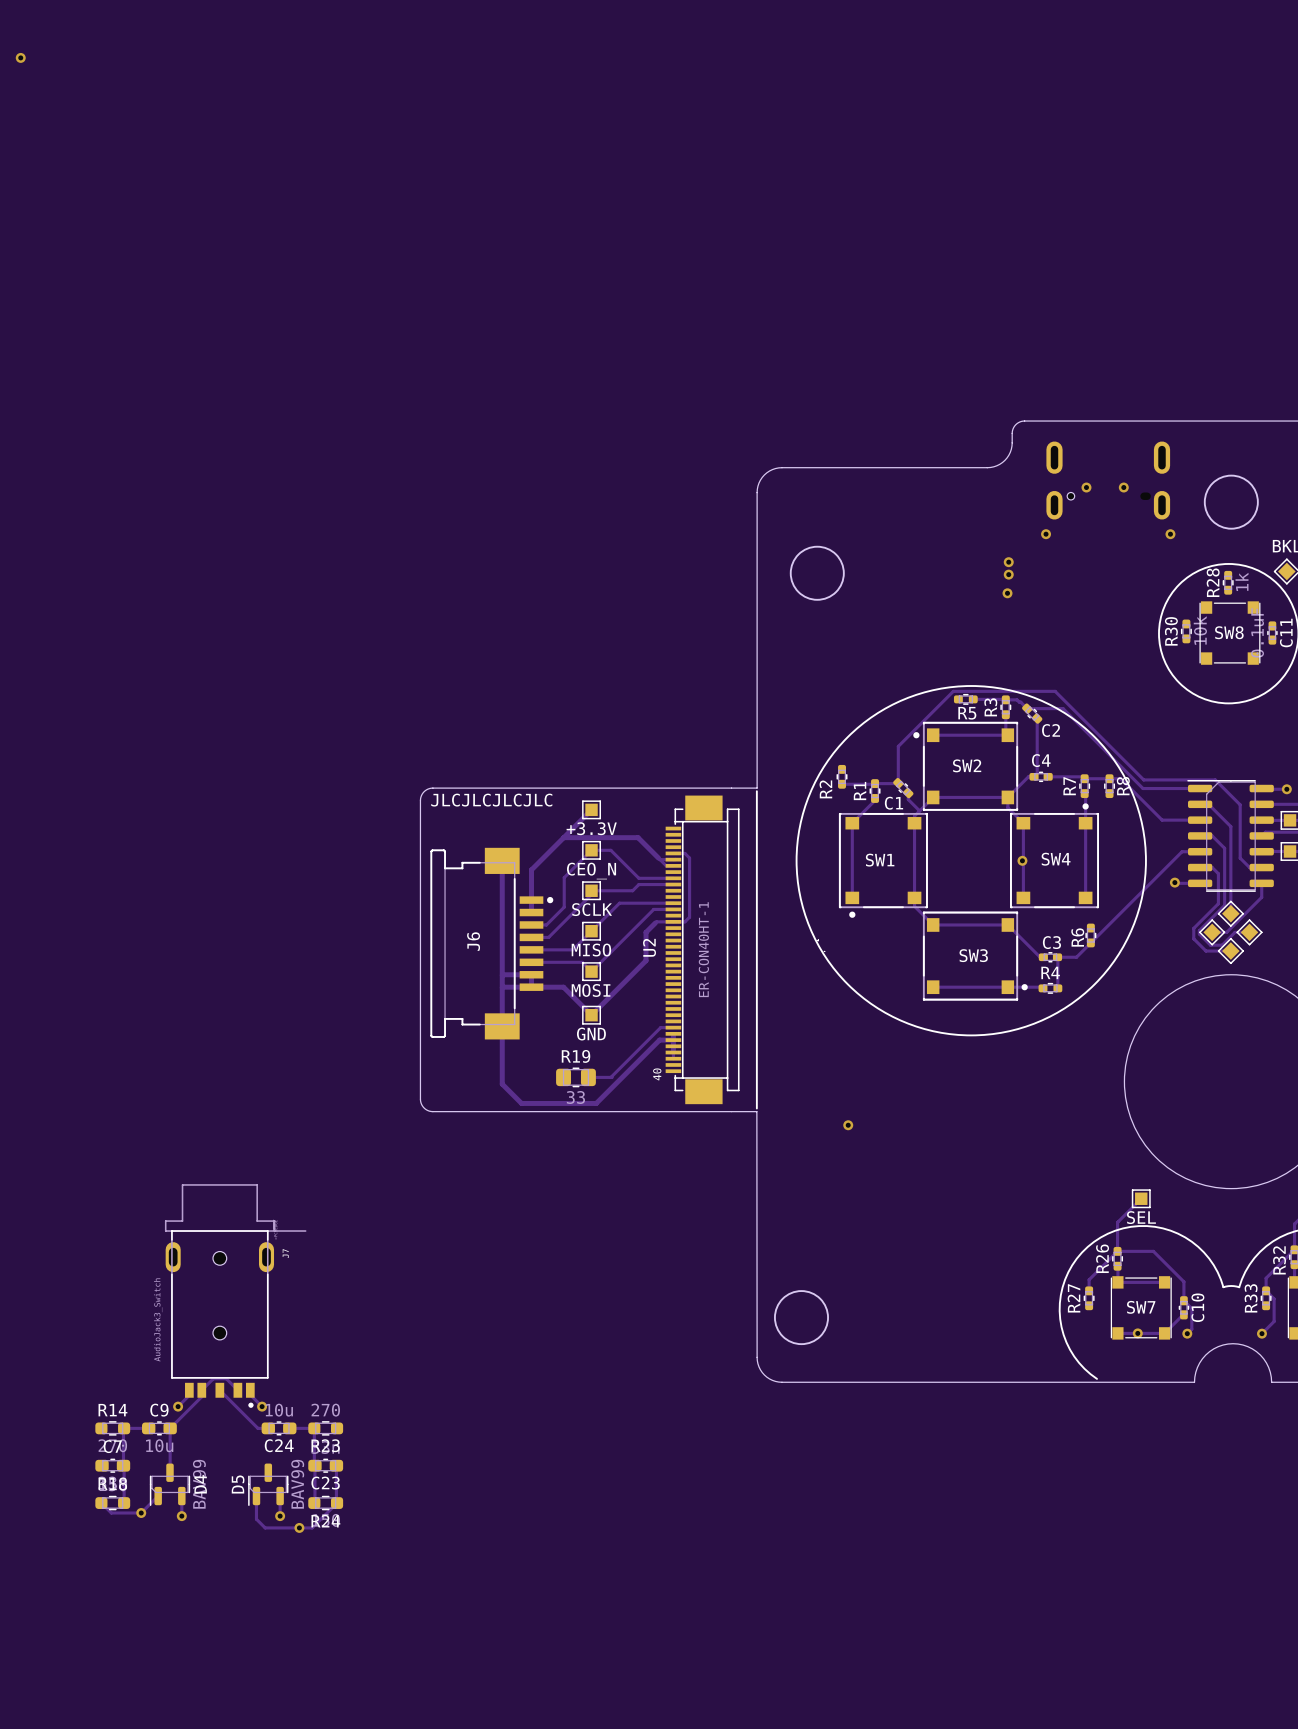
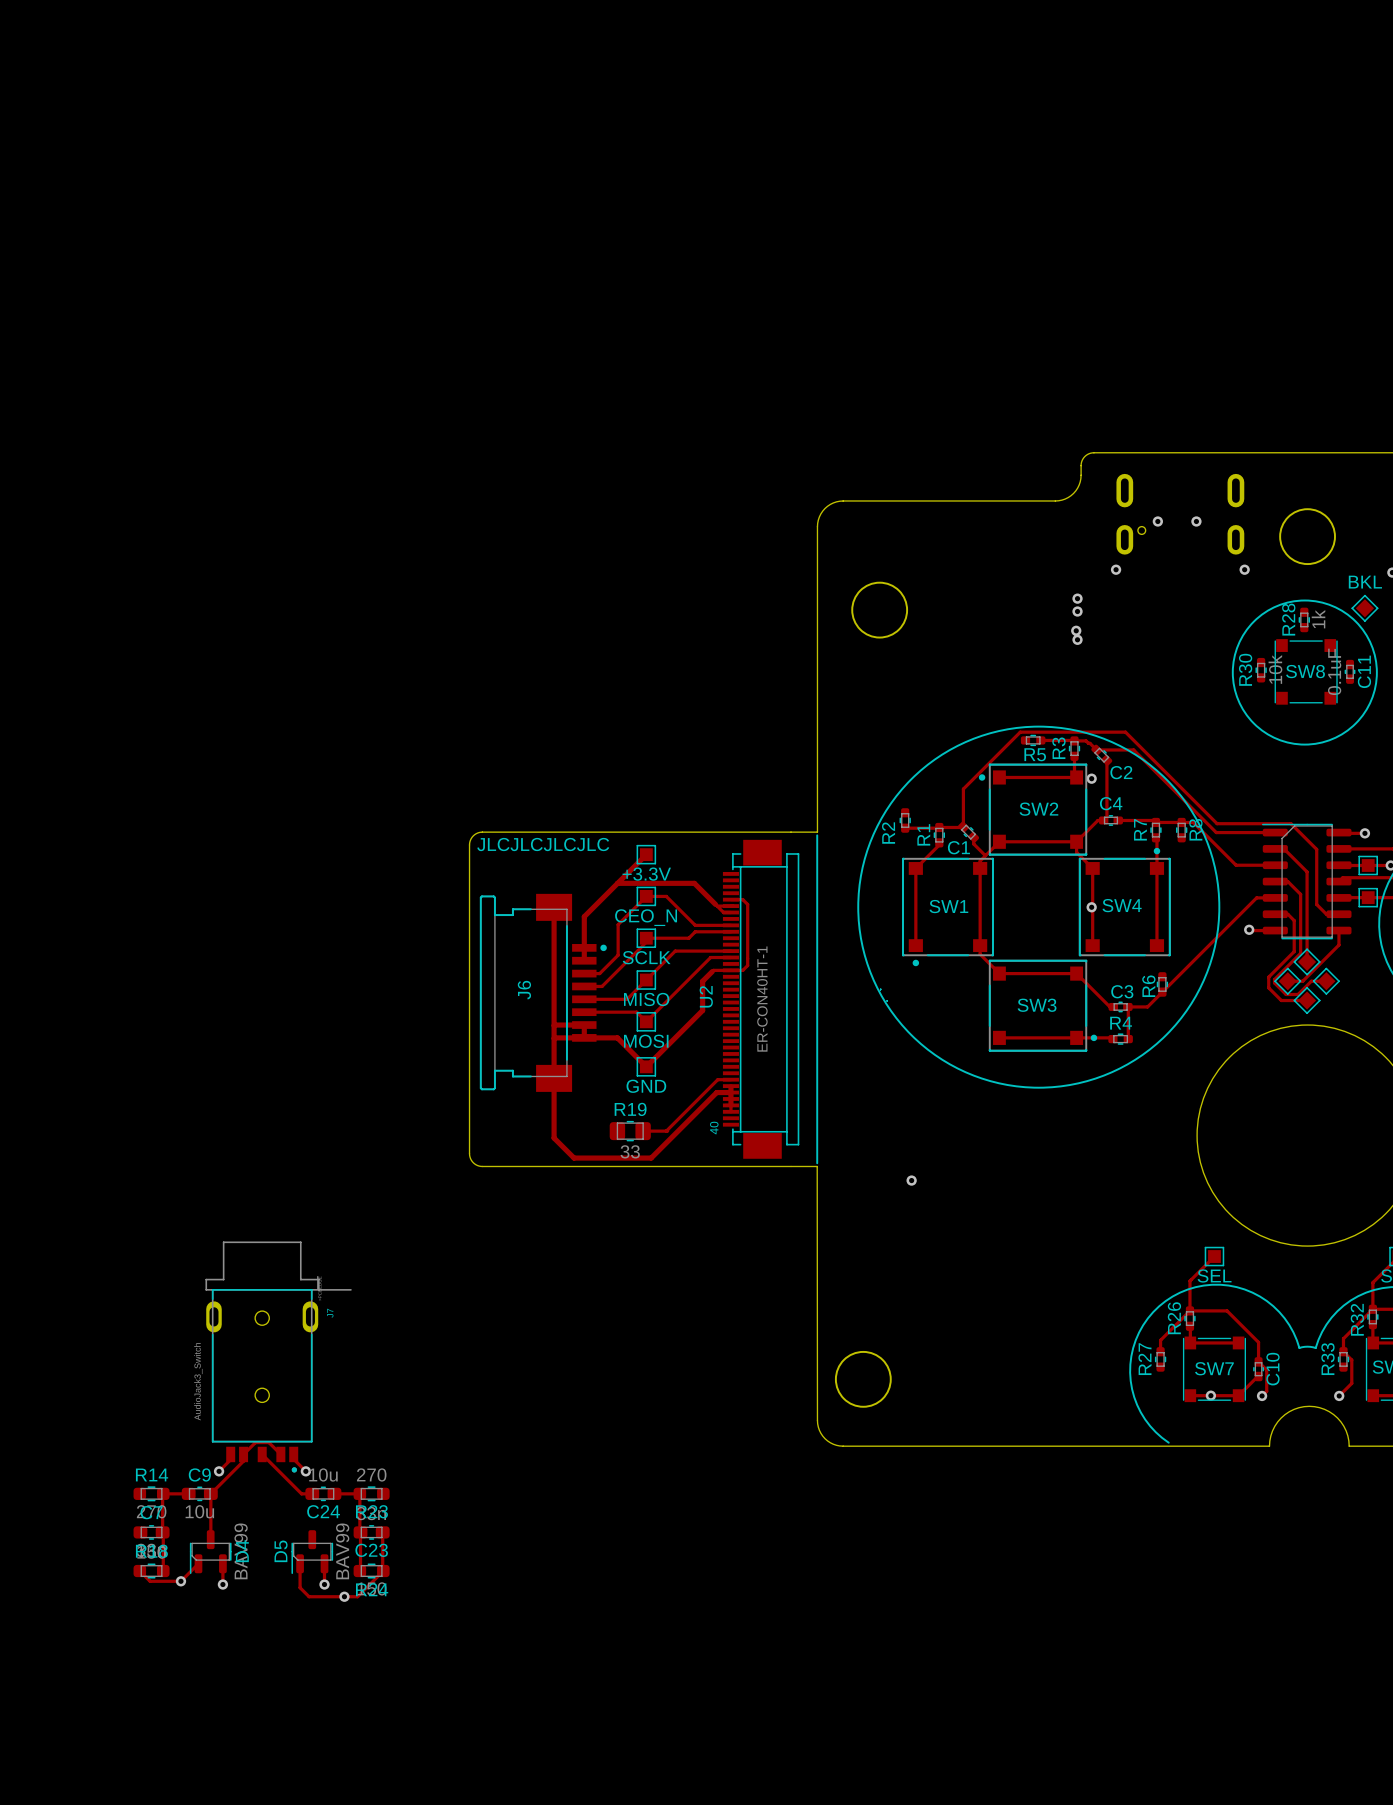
via: (20, 57) -> none
via: none -> (1077, 639)
via: none -> (1091, 778)

